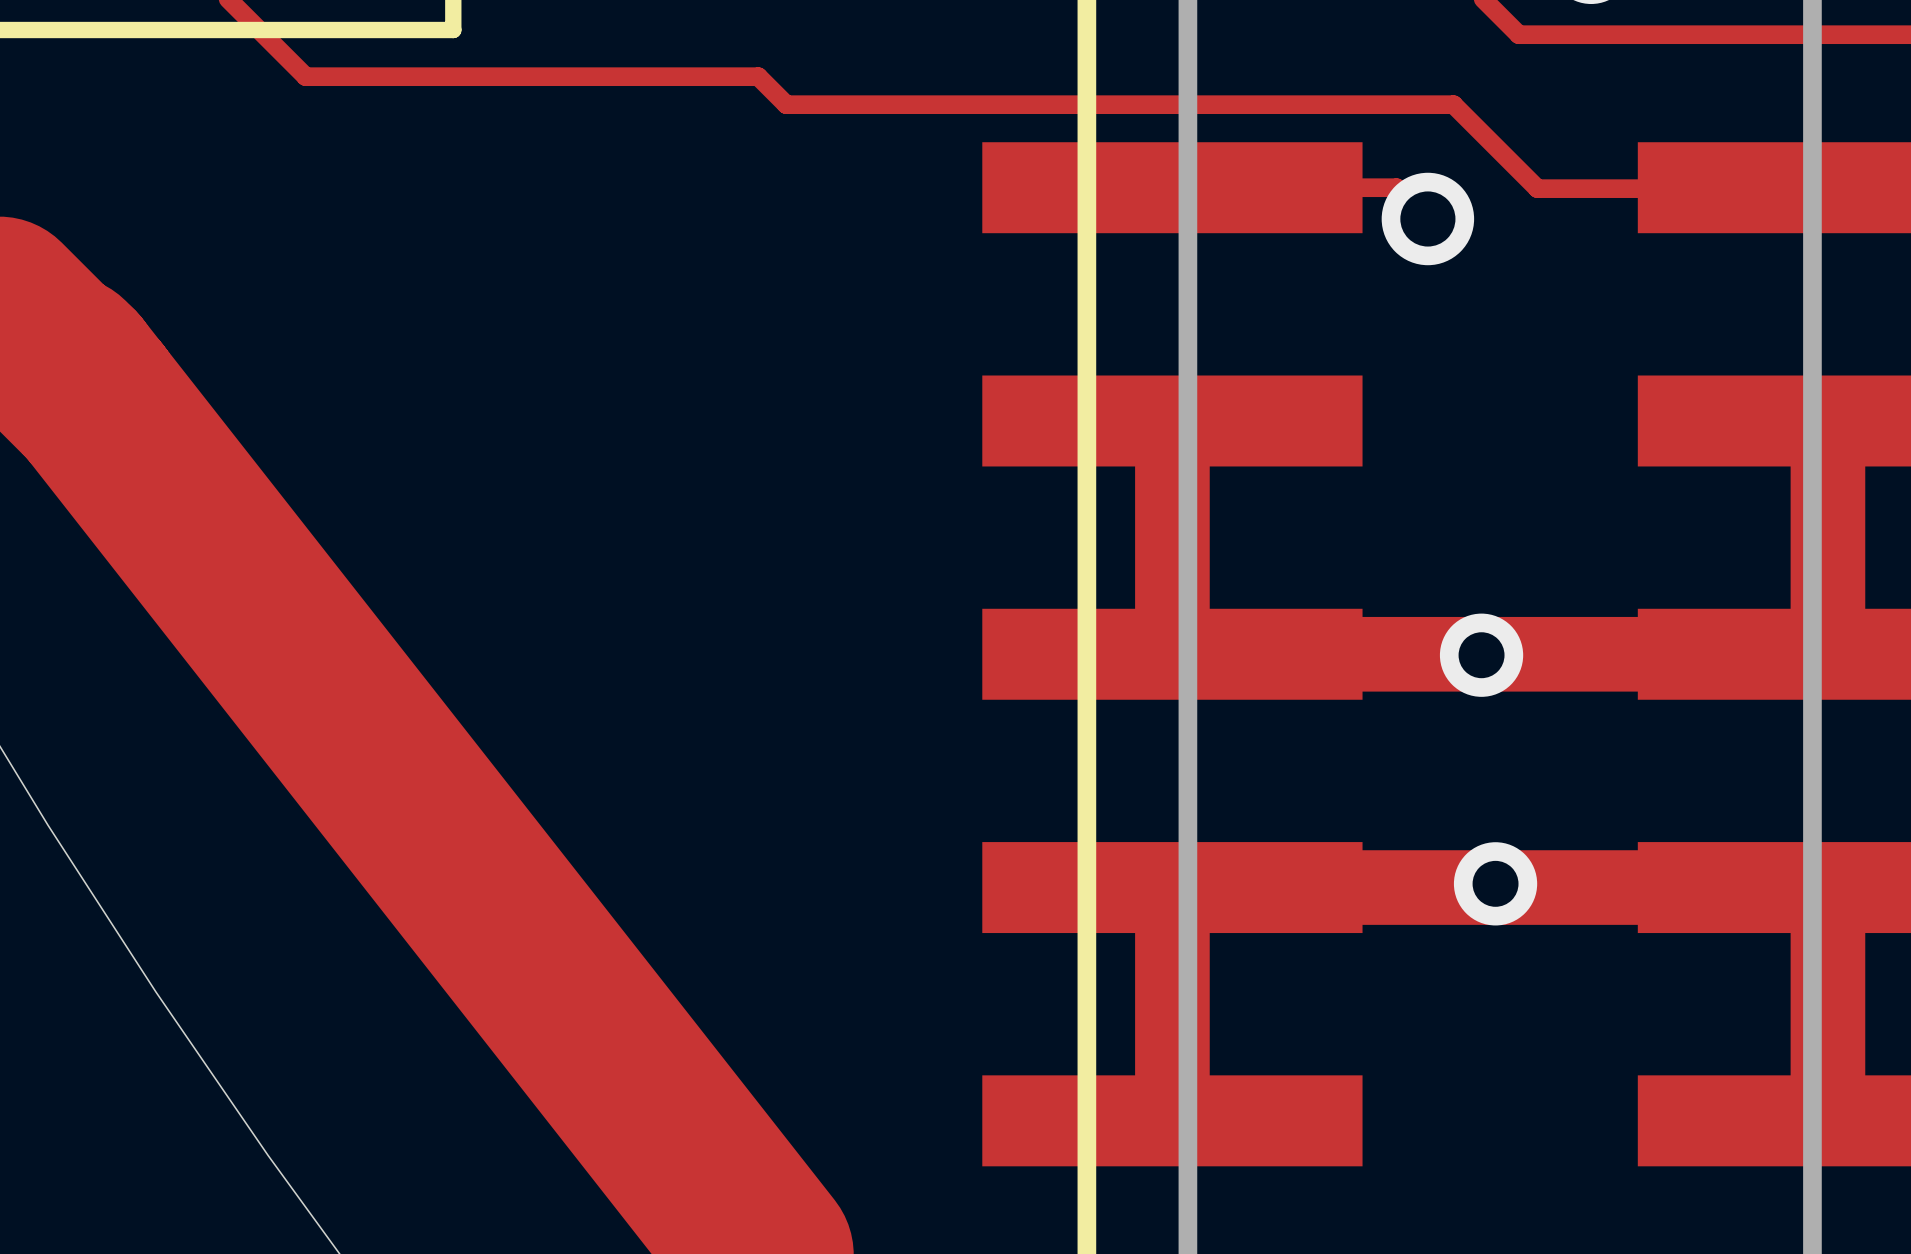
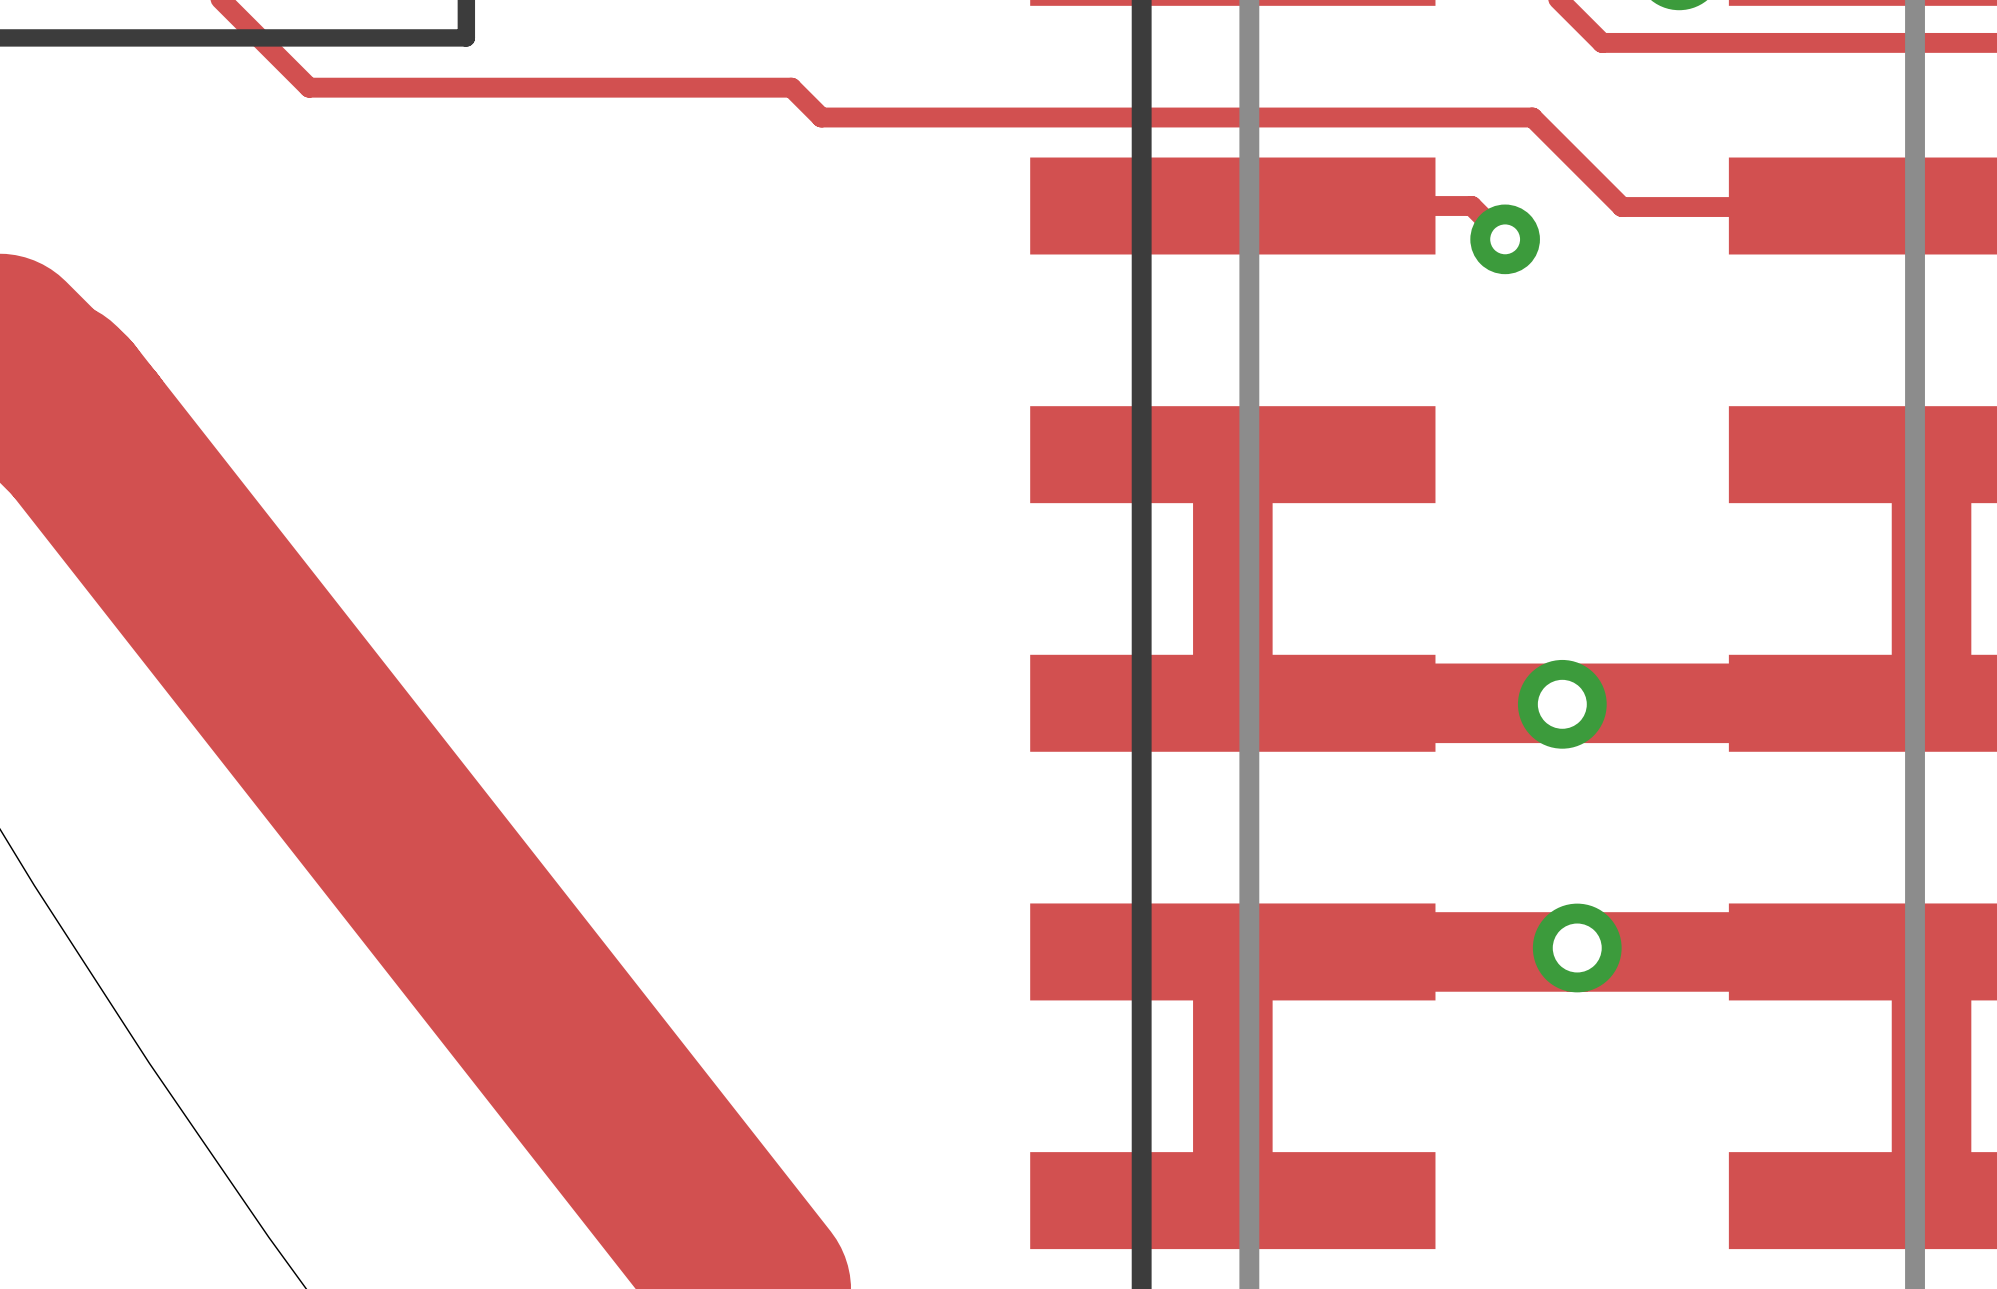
via size: [1381, 172, 1475, 266] -> [1470, 204, 1540, 275]

